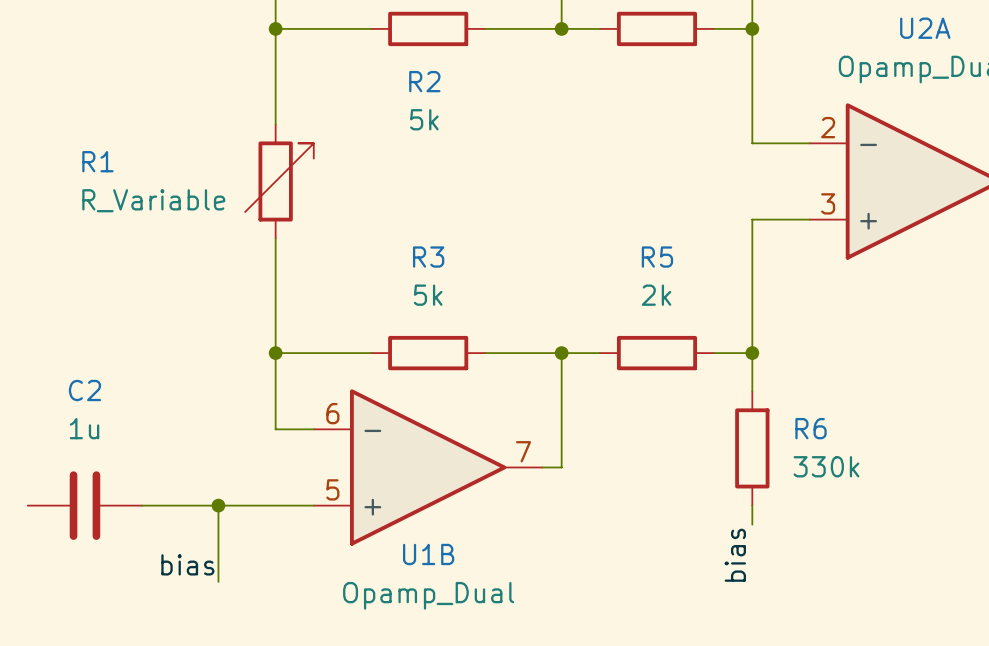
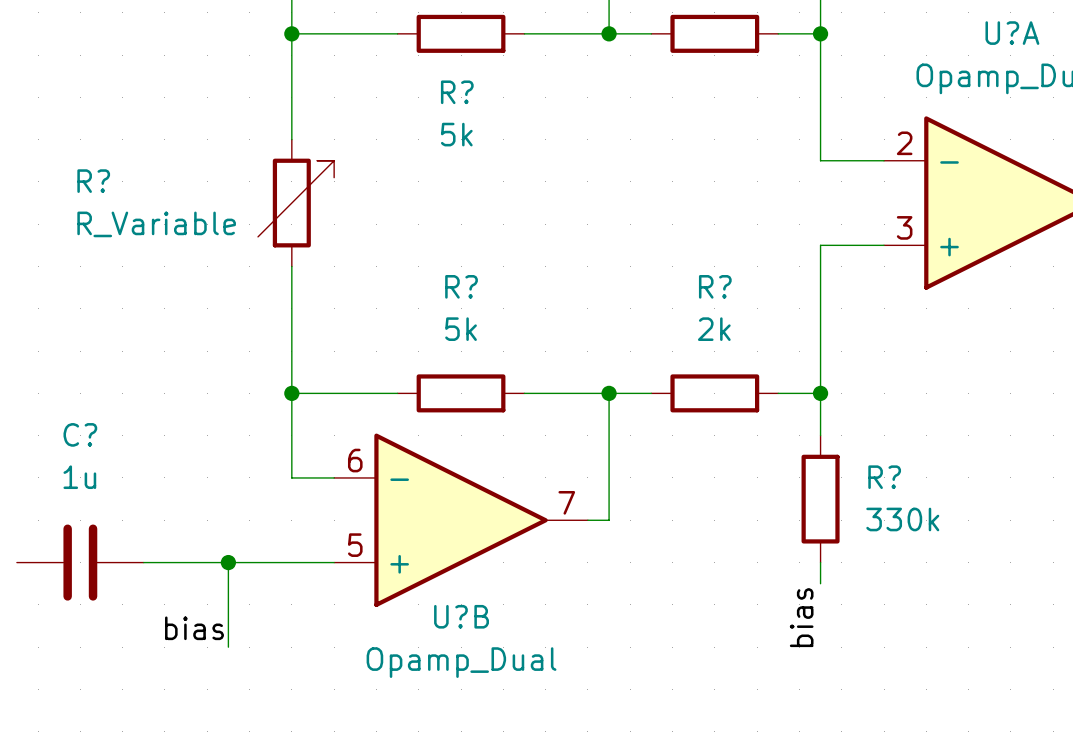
U2A name: U2A (925, 28) -> U?A (1012, 33)
R2 name: R2 (424, 81) -> R? (457, 92)
R1 name: R1 (97, 161) -> R? (93, 181)
R3 name: R3 (428, 257) -> R? (461, 286)
R5 name: R5 (657, 257) -> R? (715, 286)
C2 name: C2 (84, 390) -> C? (80, 434)
R6 name: R6 (811, 428) -> R? (884, 477)
U1B name: U1B (428, 554) -> U?B (461, 616)

